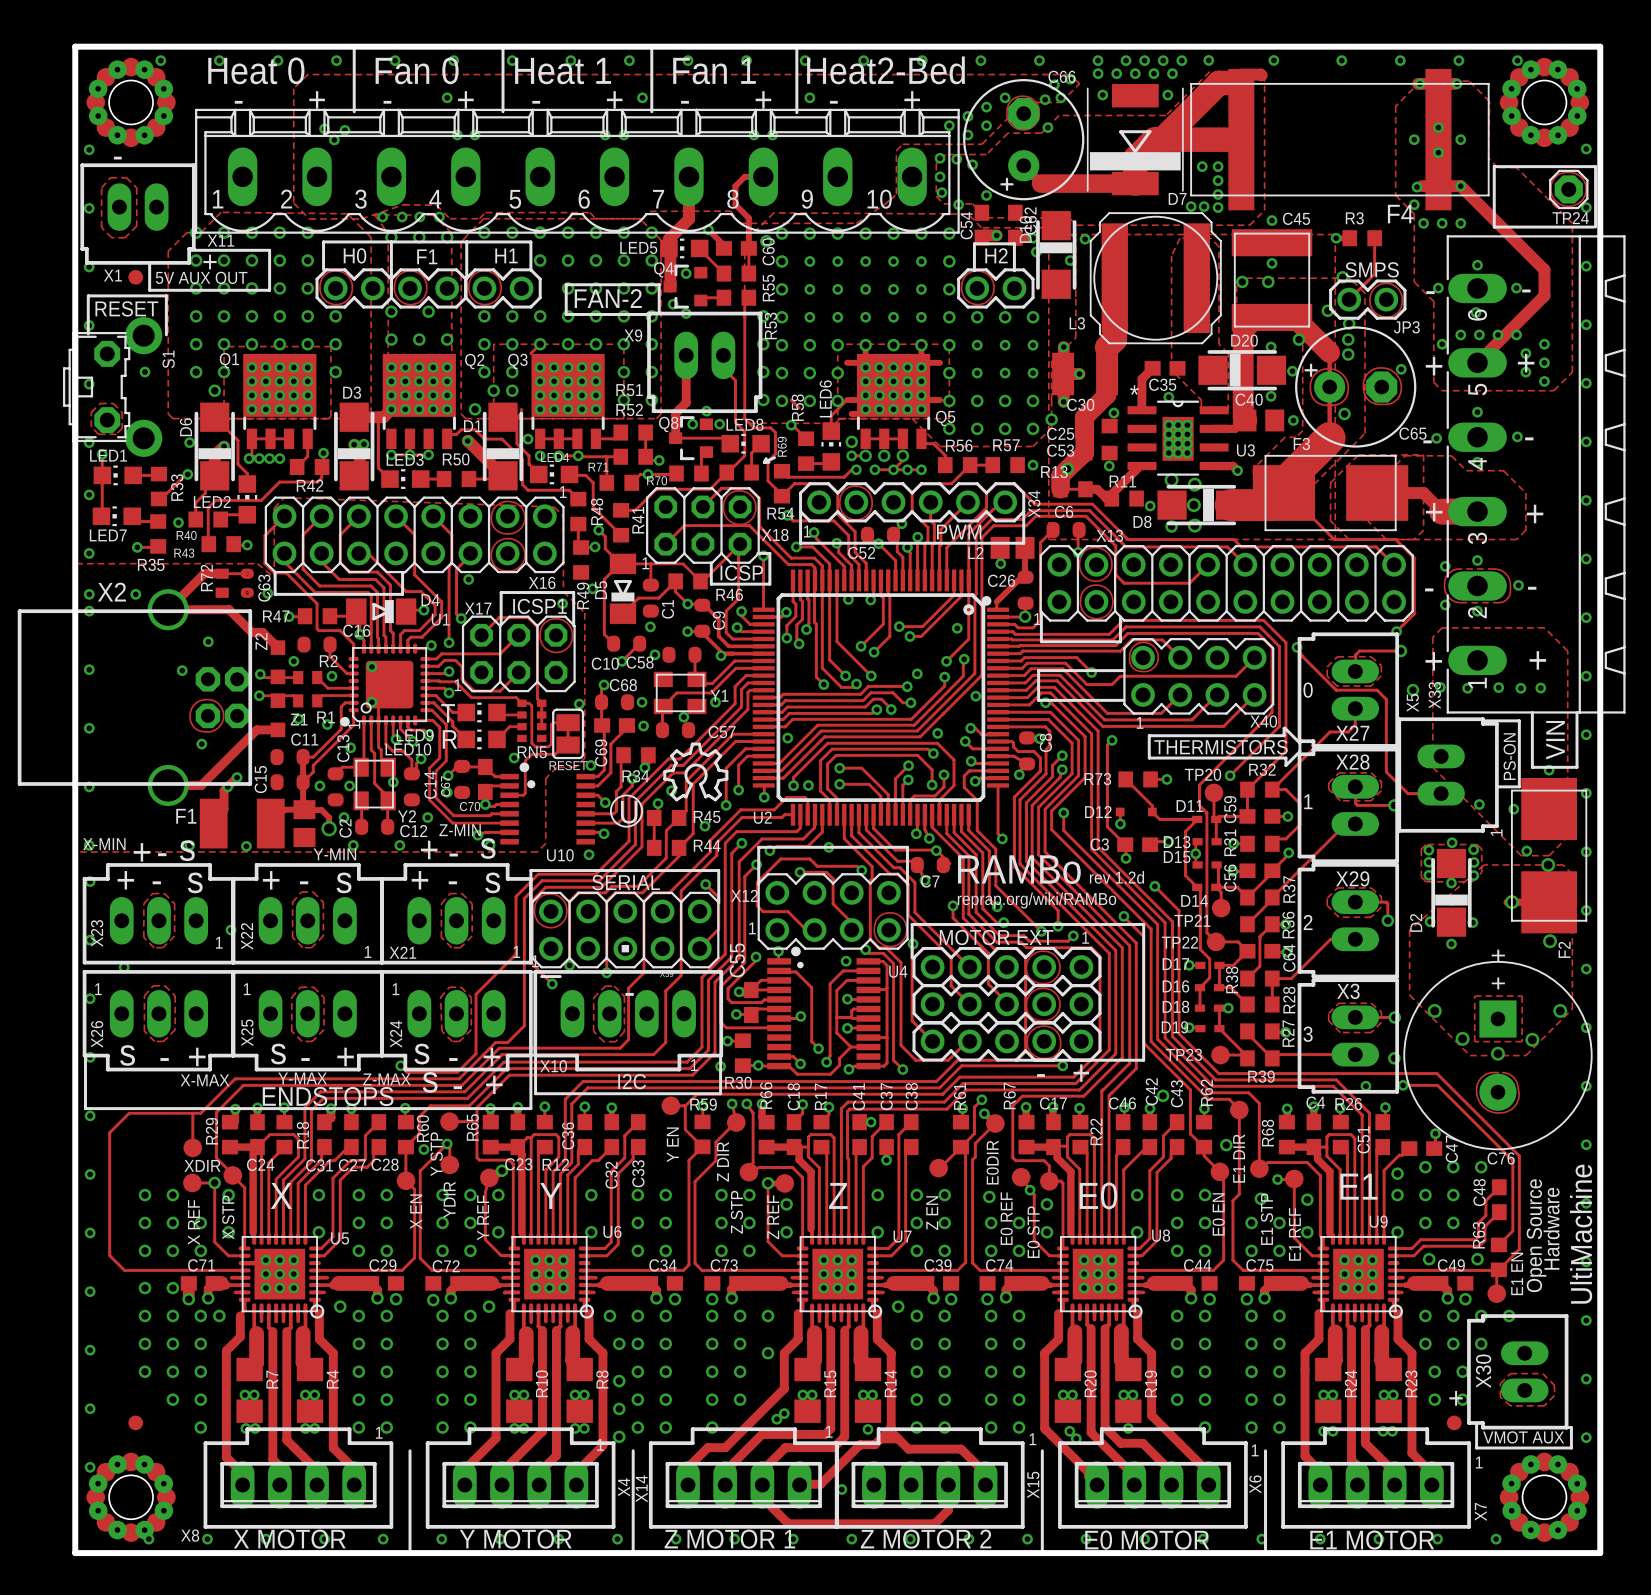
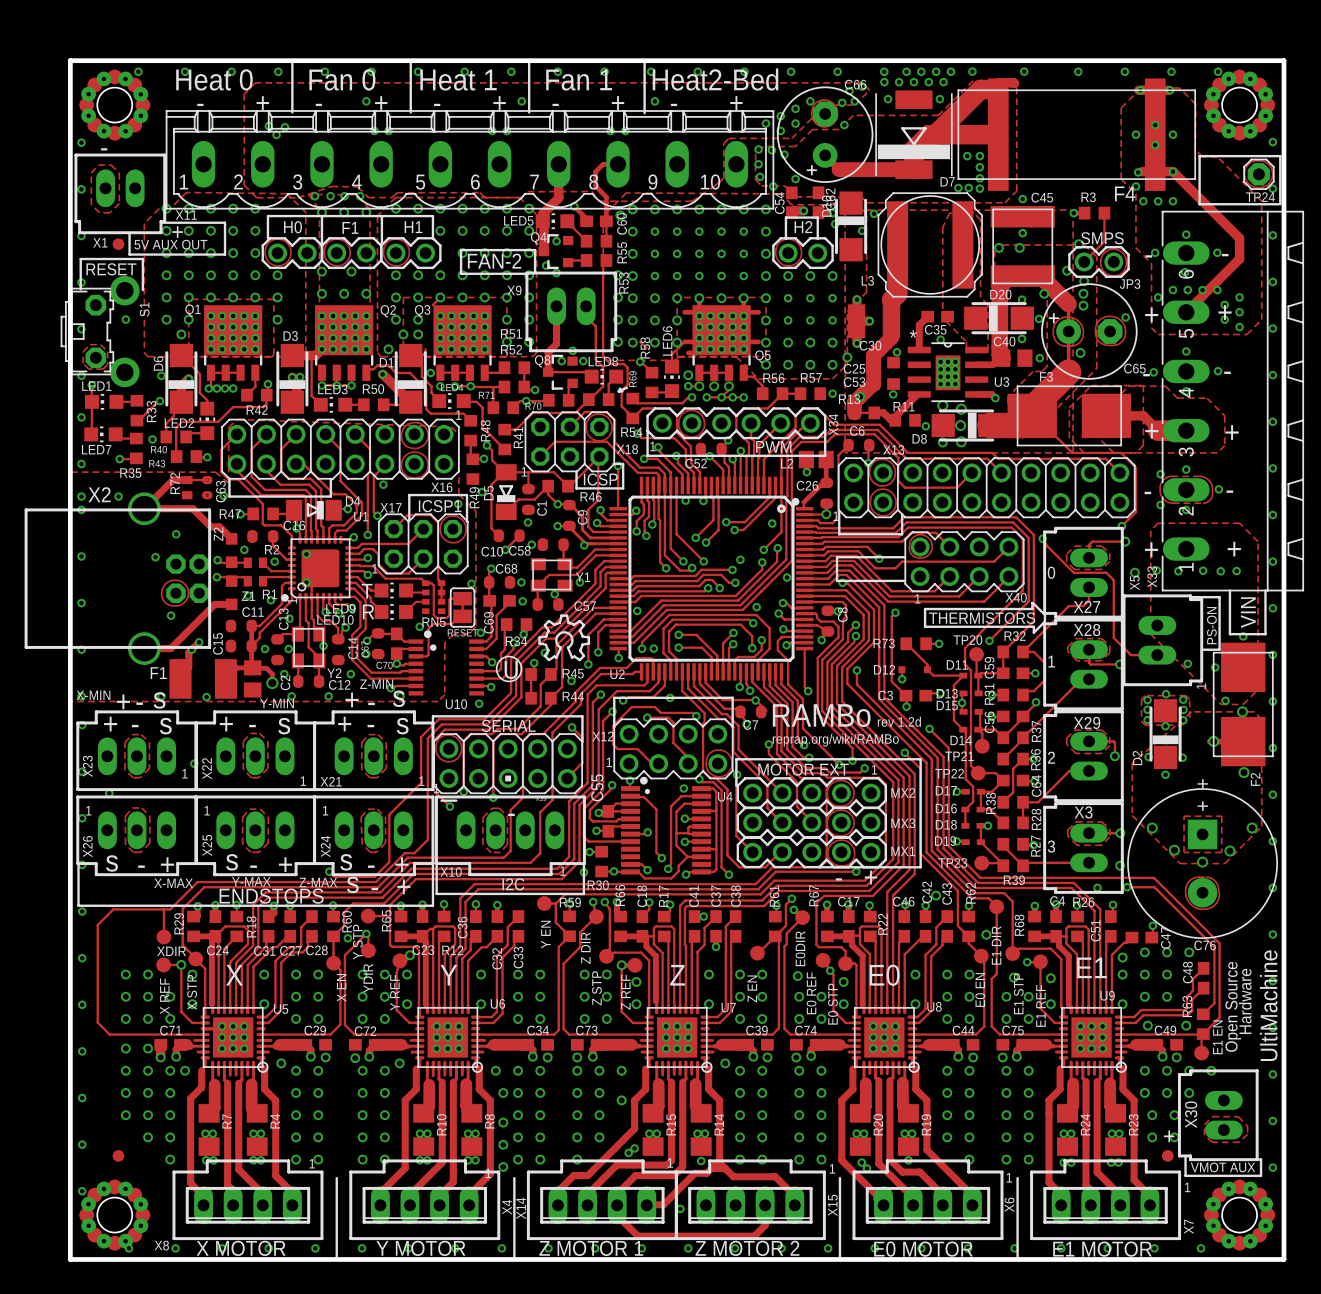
text: none -> MX2 (903, 792)
text: none -> MX3 (903, 823)
text: none -> MX1 (903, 851)

